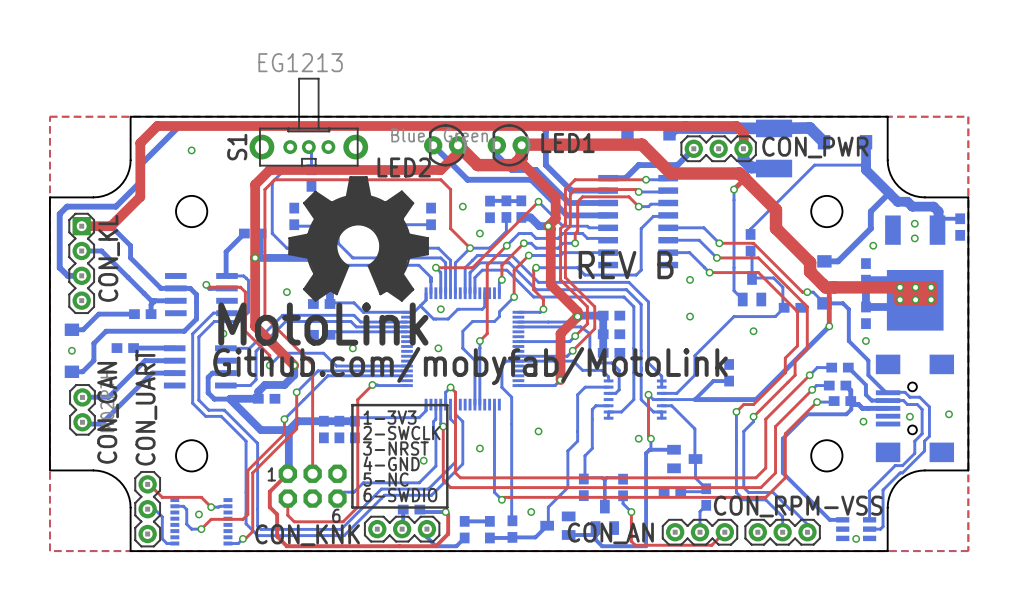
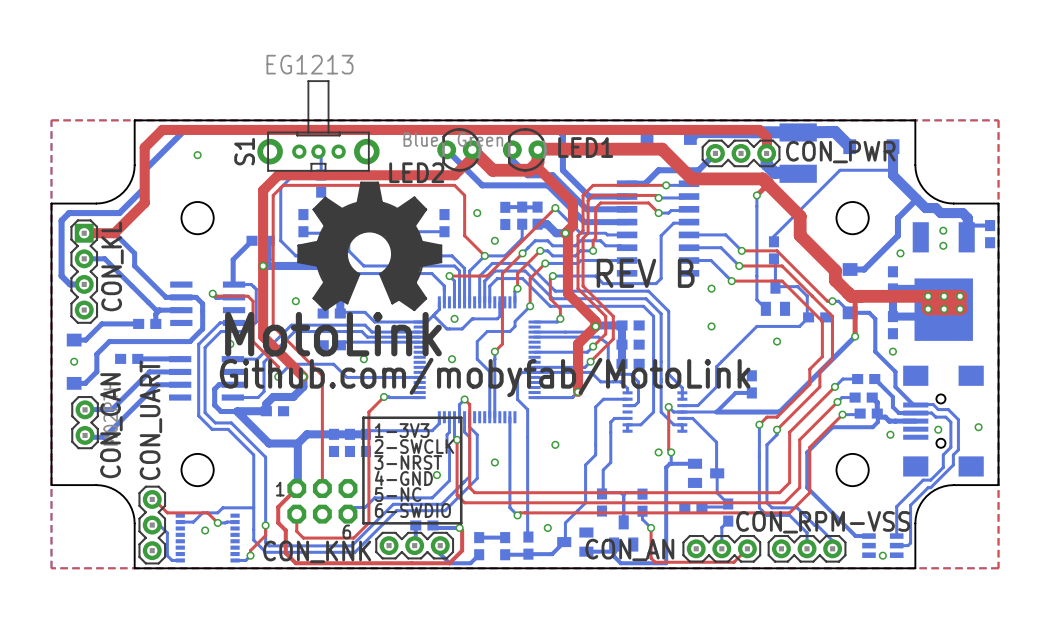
bottom track: (407, 370) (318, 370) (296, 392) -> none
bottom track: (407, 375) (327, 375) (284, 419) -> none
top track: (296, 392) (296, 428) (252, 472) (252, 531) (242, 538) -> (265, 525) (265, 535) (250, 550) (250, 555)
via: (296, 392) -> none
top track: (284, 419) (284, 433) (247, 470) (247, 514) (242, 519) (211, 519) (201, 529) -> none
via: (284, 419) -> none
bottom track: (183, 506) (186, 509) (186, 524) (191, 529) (201, 529) -> (189, 522) (193, 522) (202, 512) (217, 512) (222, 507) (253, 507)
via: none -> (265, 525)
via: (201, 529) -> none

